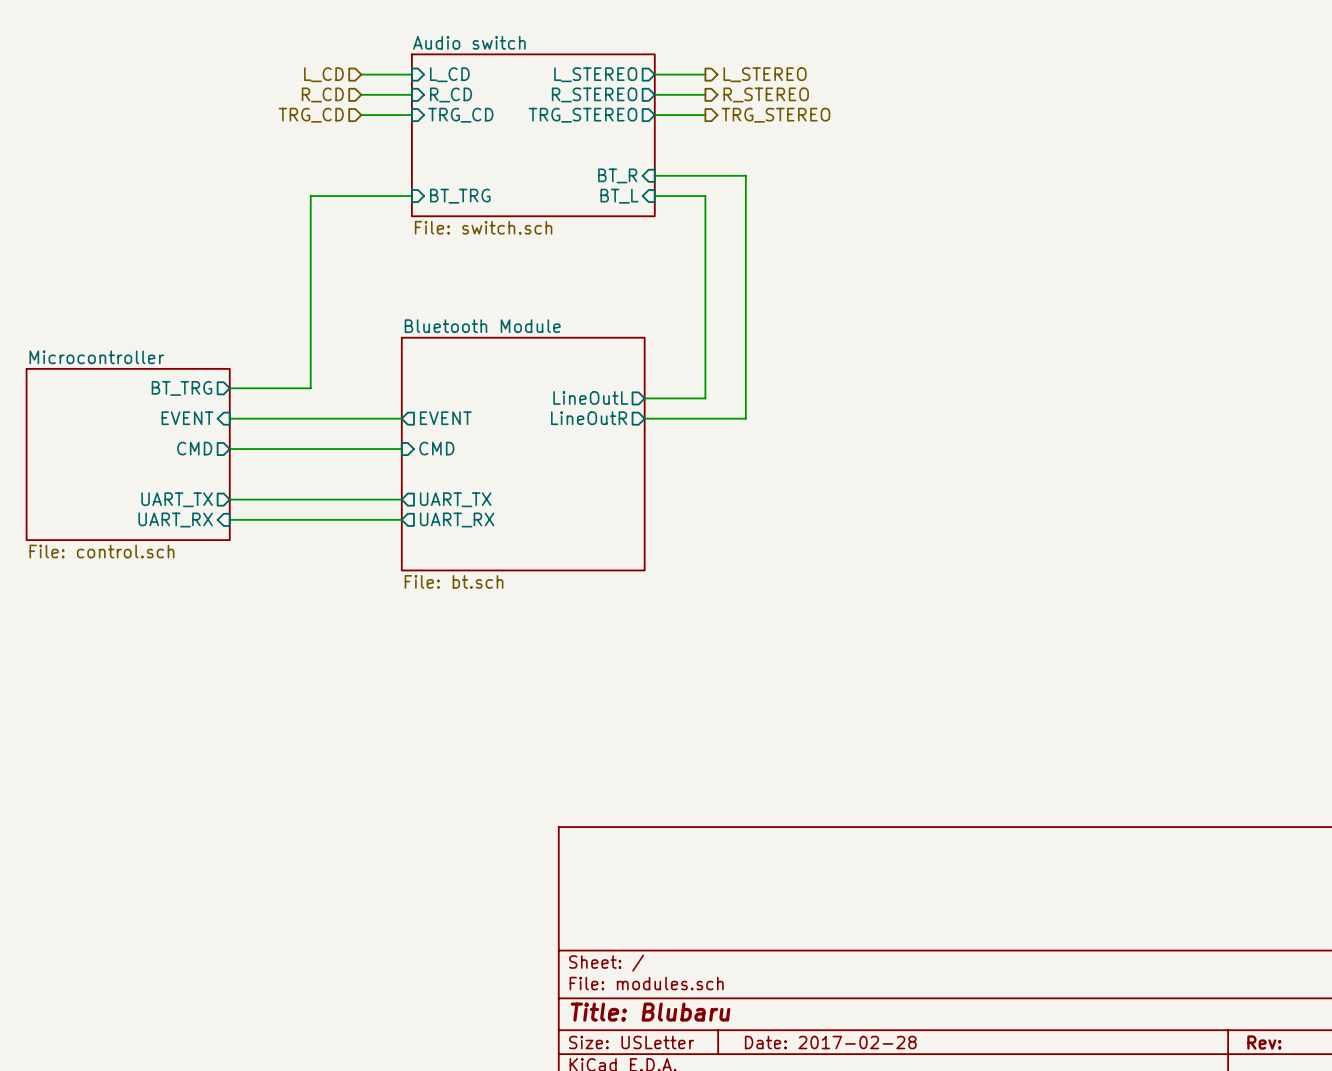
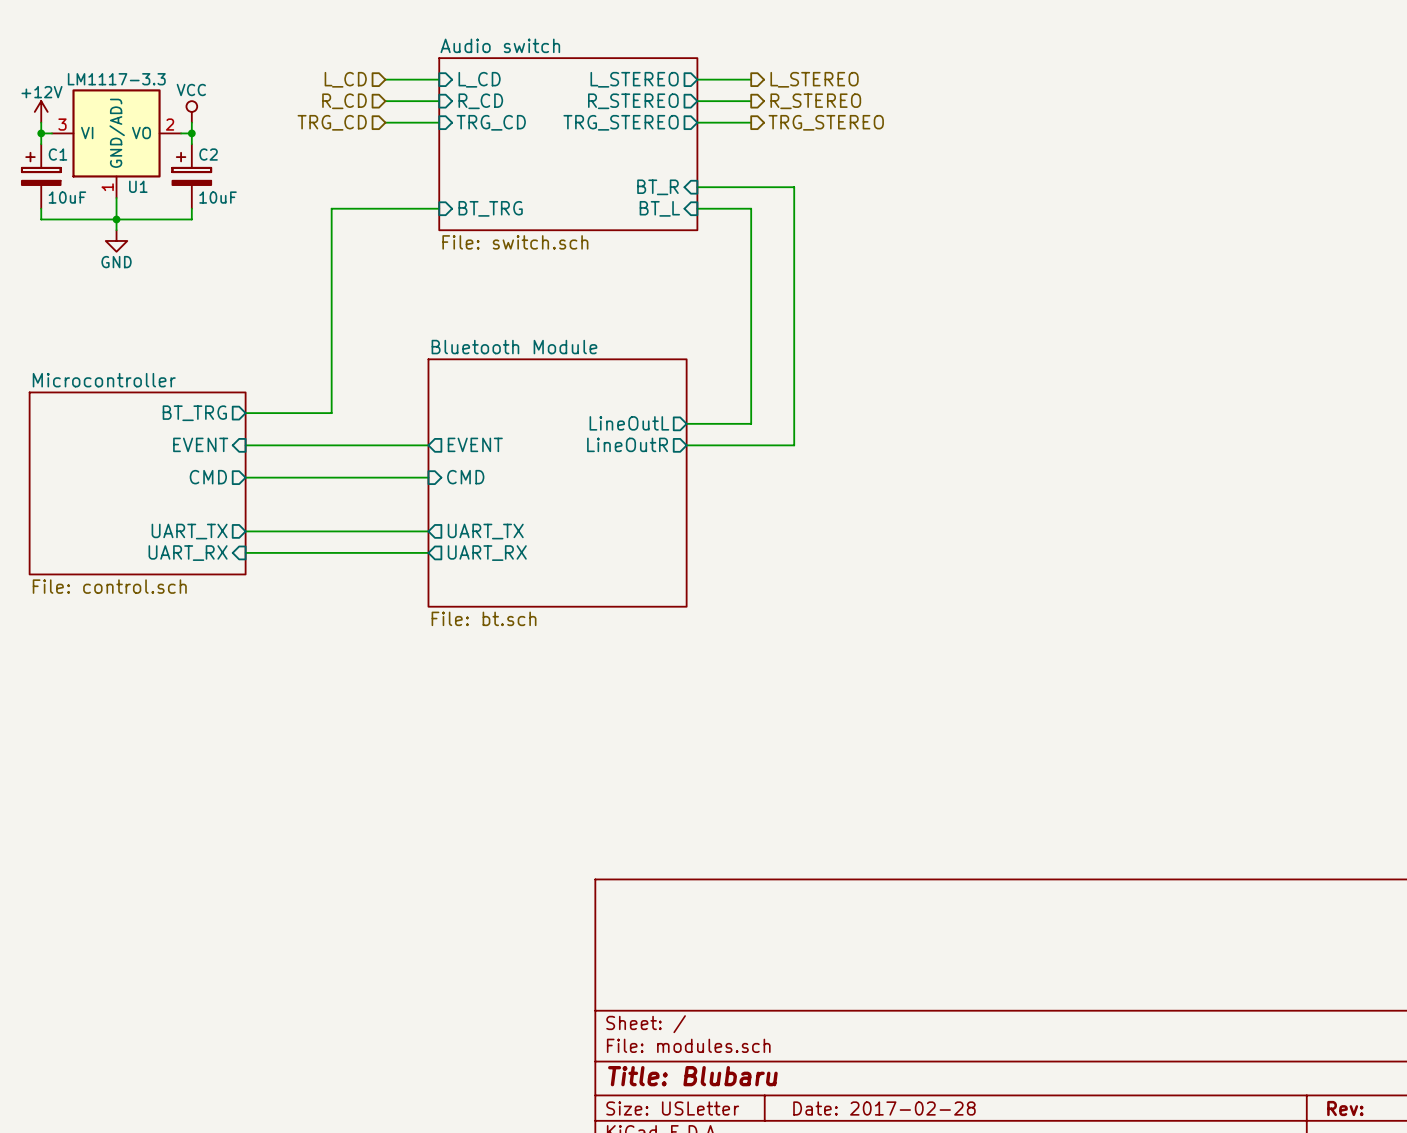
power symbol: none -> +12V (41, 111)
power symbol: none -> VCC (191, 111)
wire: none -> (41, 122) (41, 144)
wire: none -> (191, 122) (191, 144)
wire: none -> (41, 133) (51, 133)
junction: none -> (41, 133)
wire: none -> (181, 133) (191, 133)
junction: none -> (191, 133)
U1: none -> LM1117-3.3 (116, 143)
C1: none -> 10uF (41, 176)
C2: none -> 10uF (191, 176)
wire: none -> (116, 197) (116, 230)
wire: none -> (41, 208) (41, 219) (191, 219) (191, 208)
junction: none -> (116, 219)
power symbol: none -> GND (116, 240)

